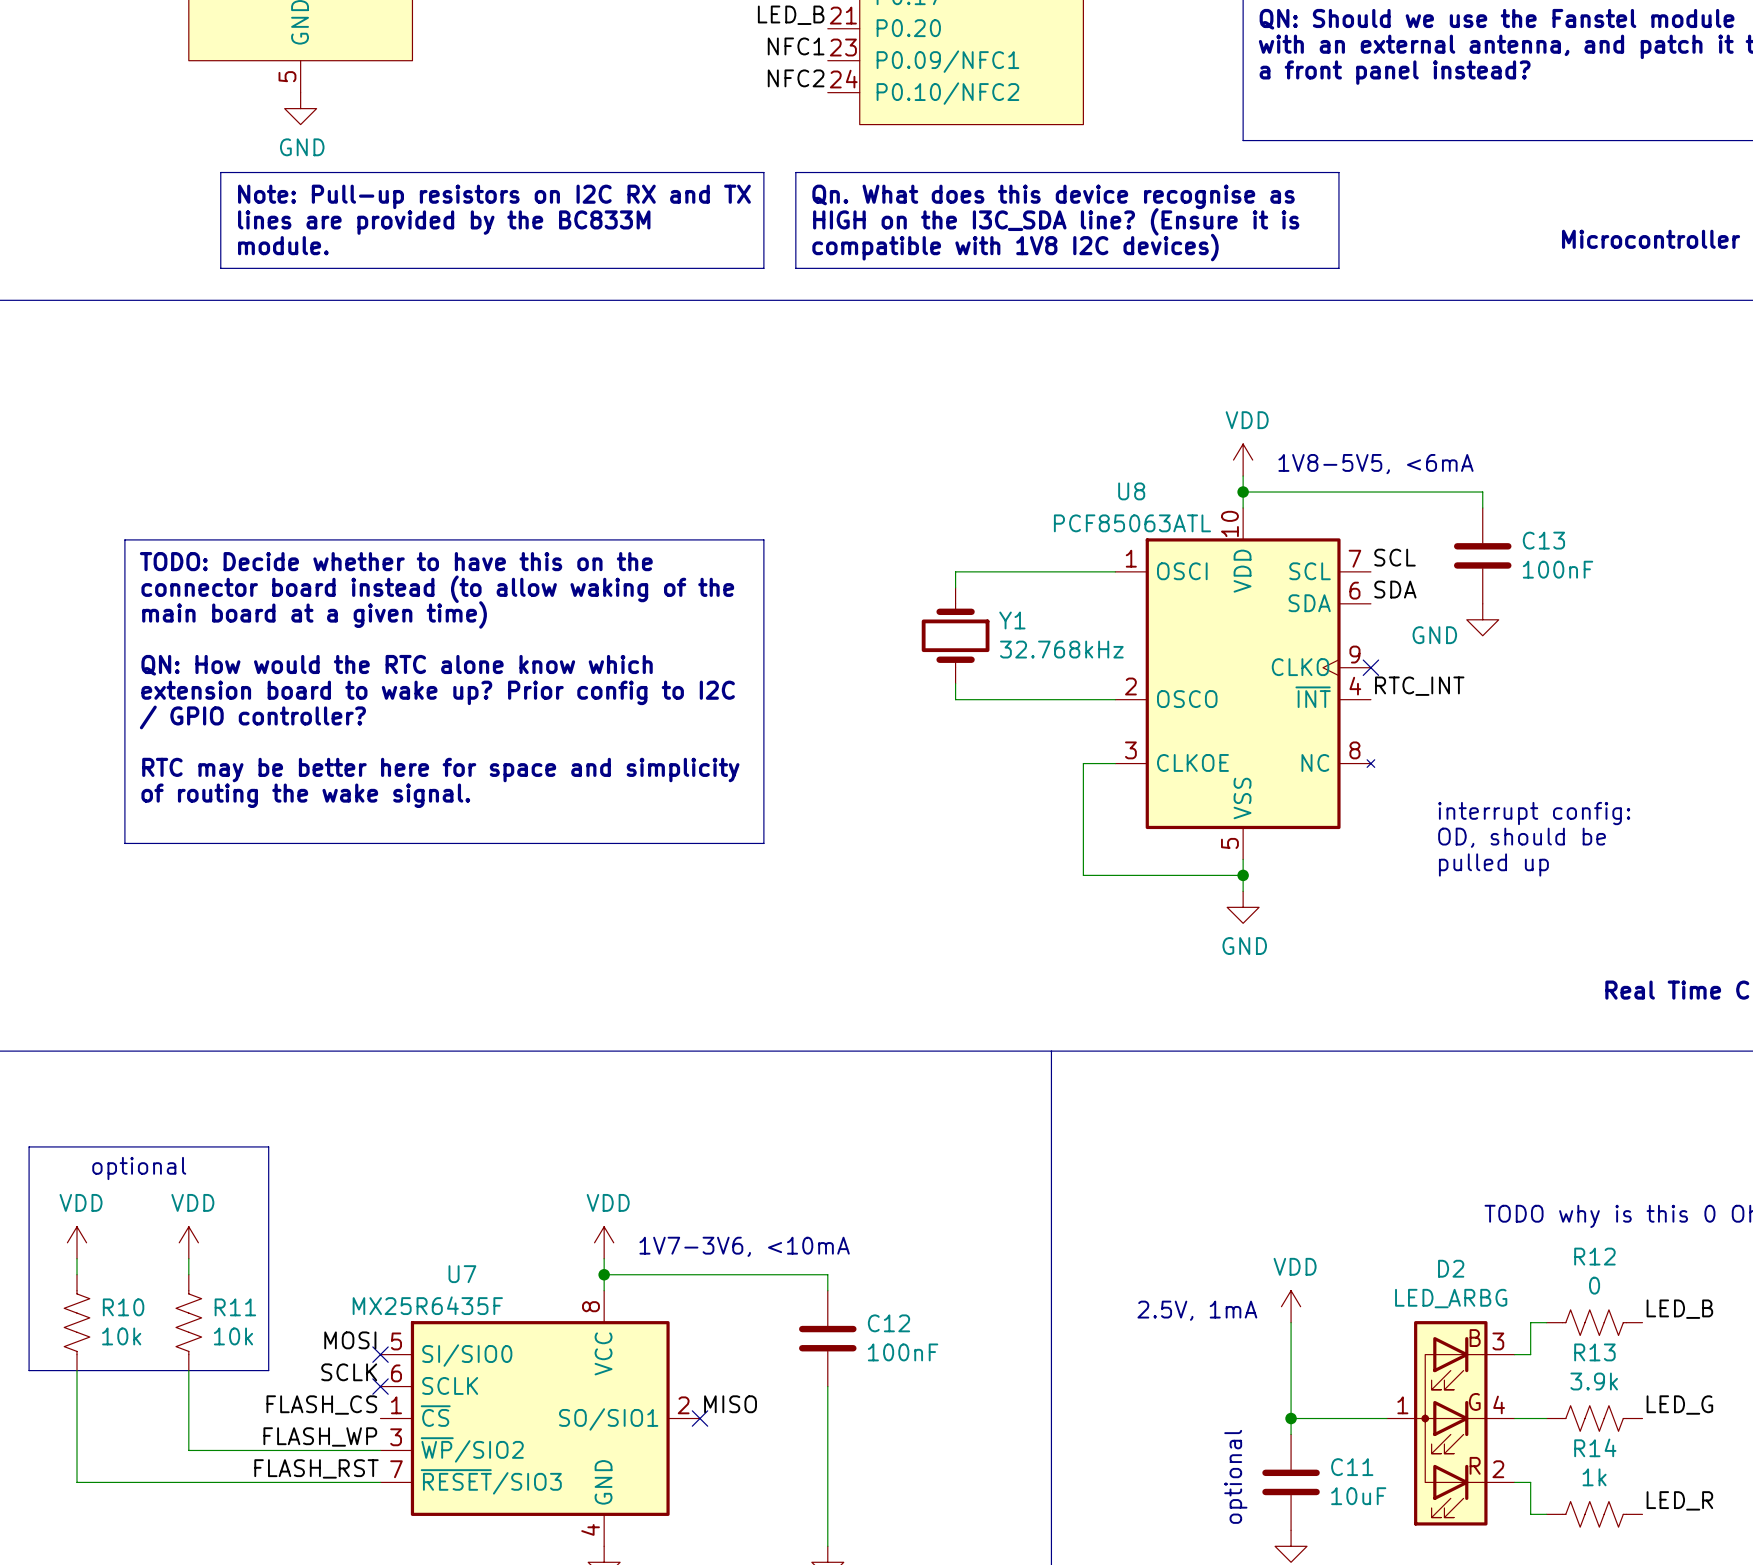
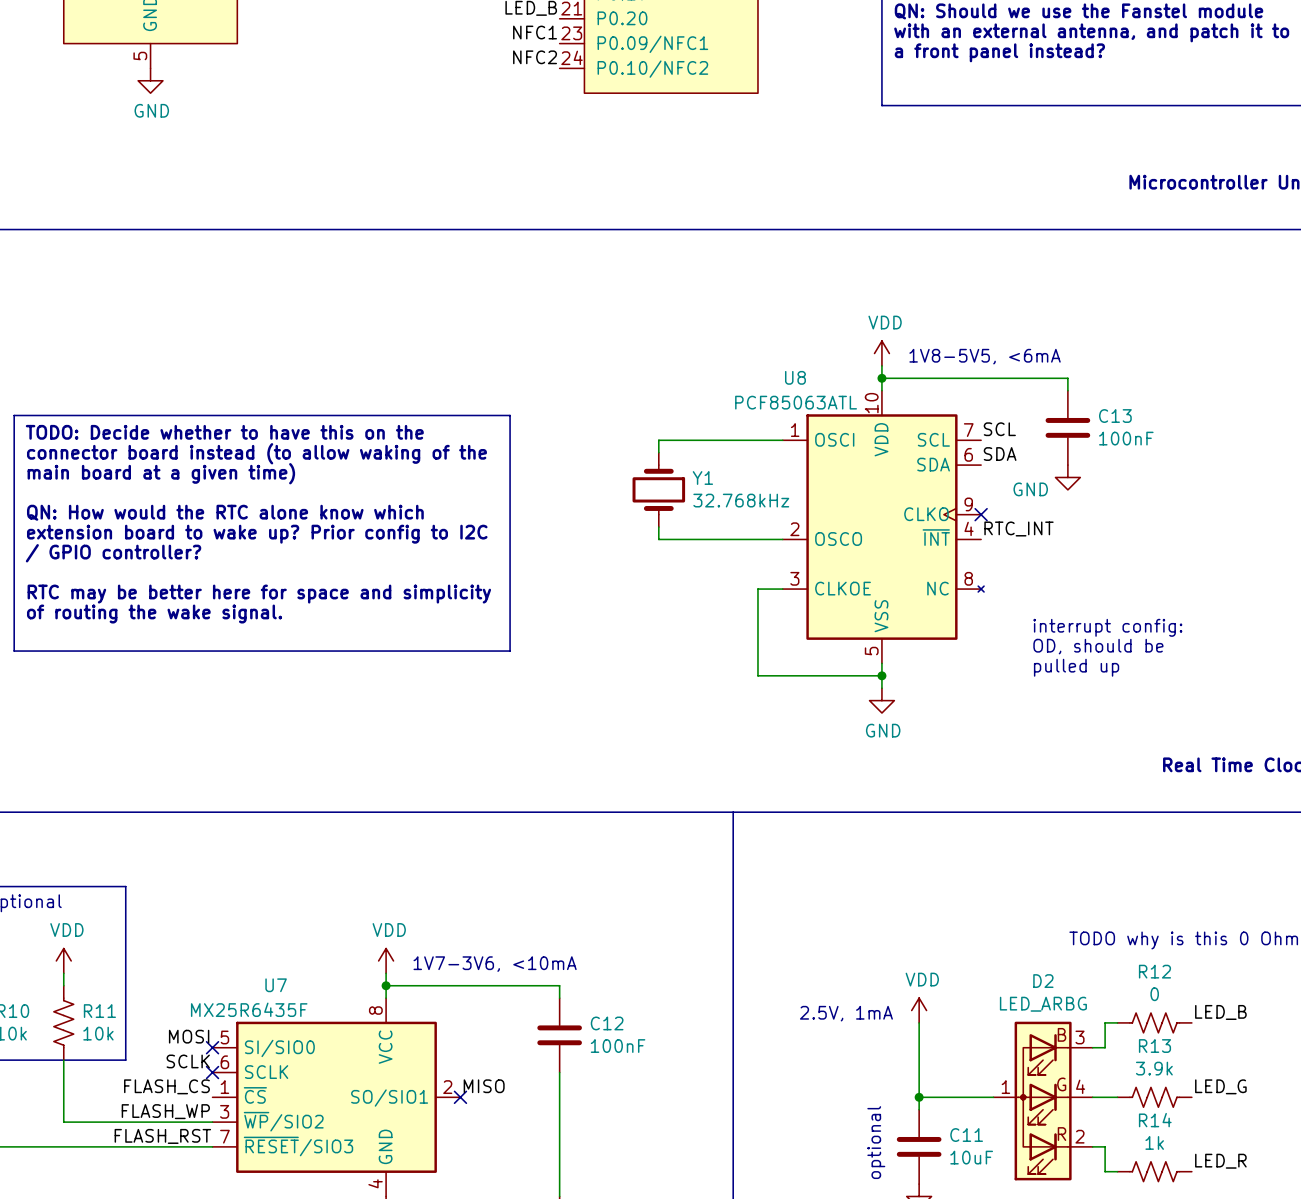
line: (220, 172) (763, 172) (763, 268) (220, 268) (220, 172) -> none
line: (795, 172) (1338, 172) (1338, 268) (795, 268) (795, 172) -> none
text: Note: Pull-up resistors on I2C RX and TX (494, 196) -> none
text: Qn. What does this device recognise as (1053, 196) -> none
text: HIGH on the I3C_SDA line? (Ensure it is (1056, 221) -> none
text: lines are provided by the BC833M (444, 222) -> none
text: module. (283, 245) -> none
text: compatible with 1V8 I2C devices) (1015, 247) -> none

